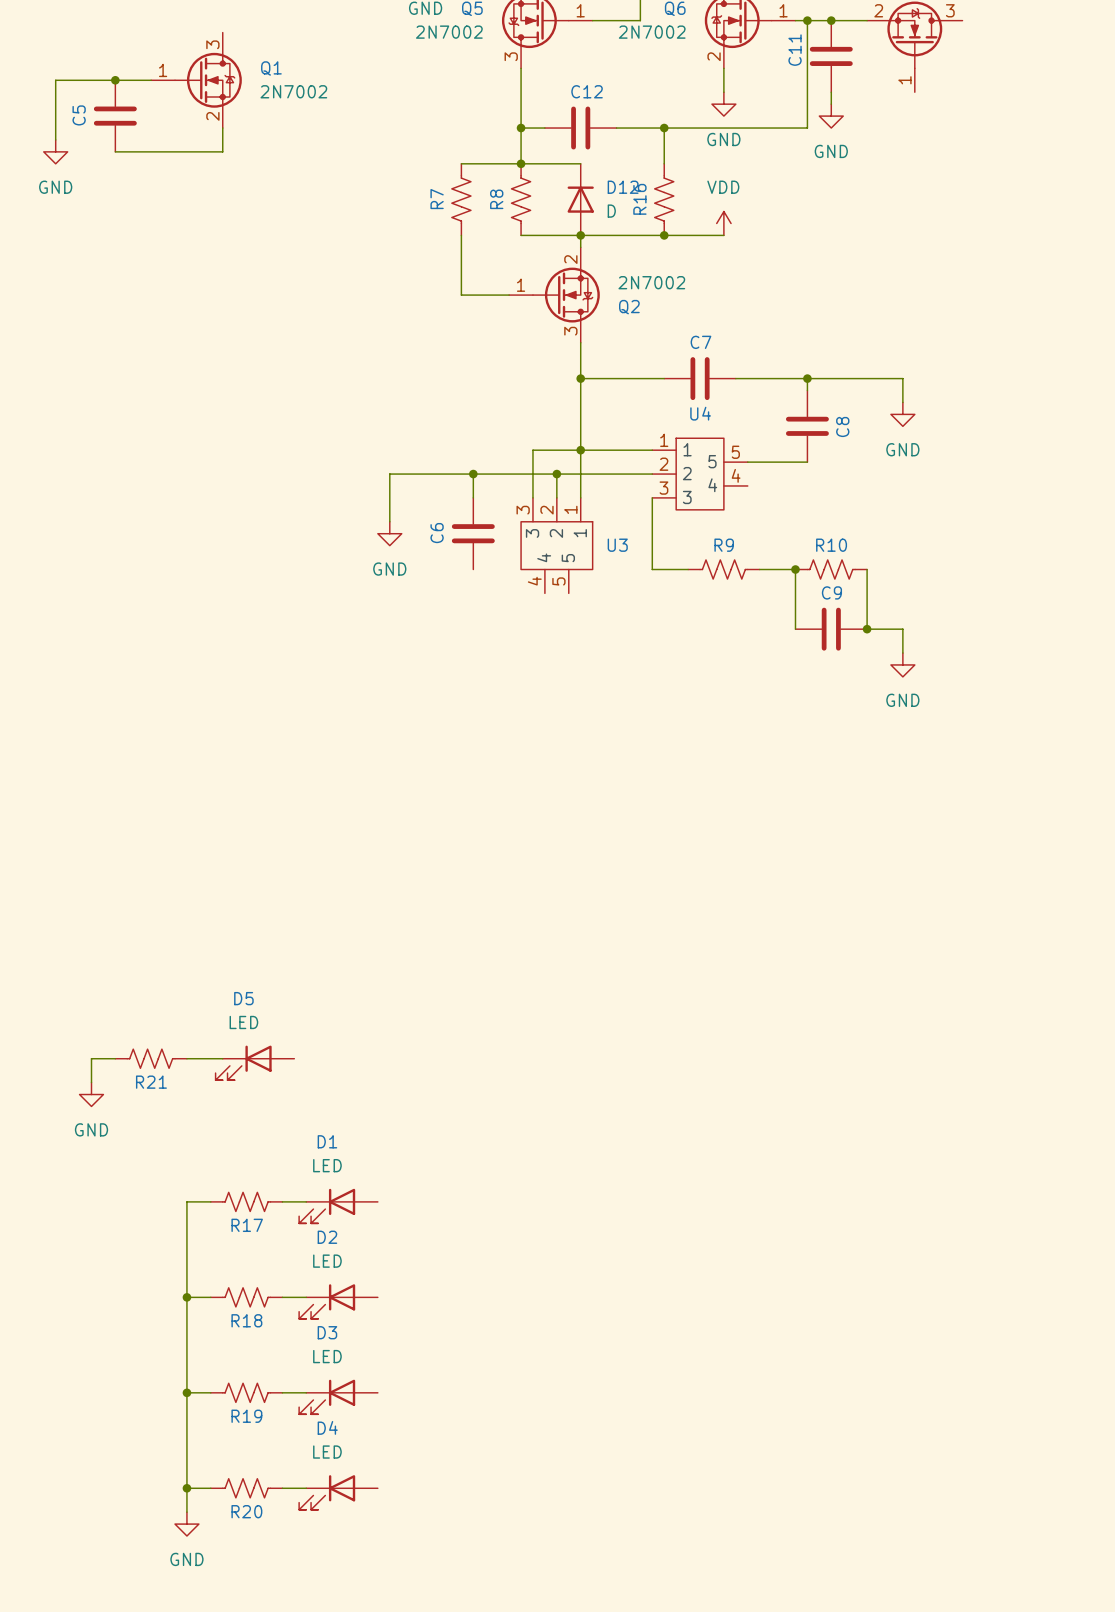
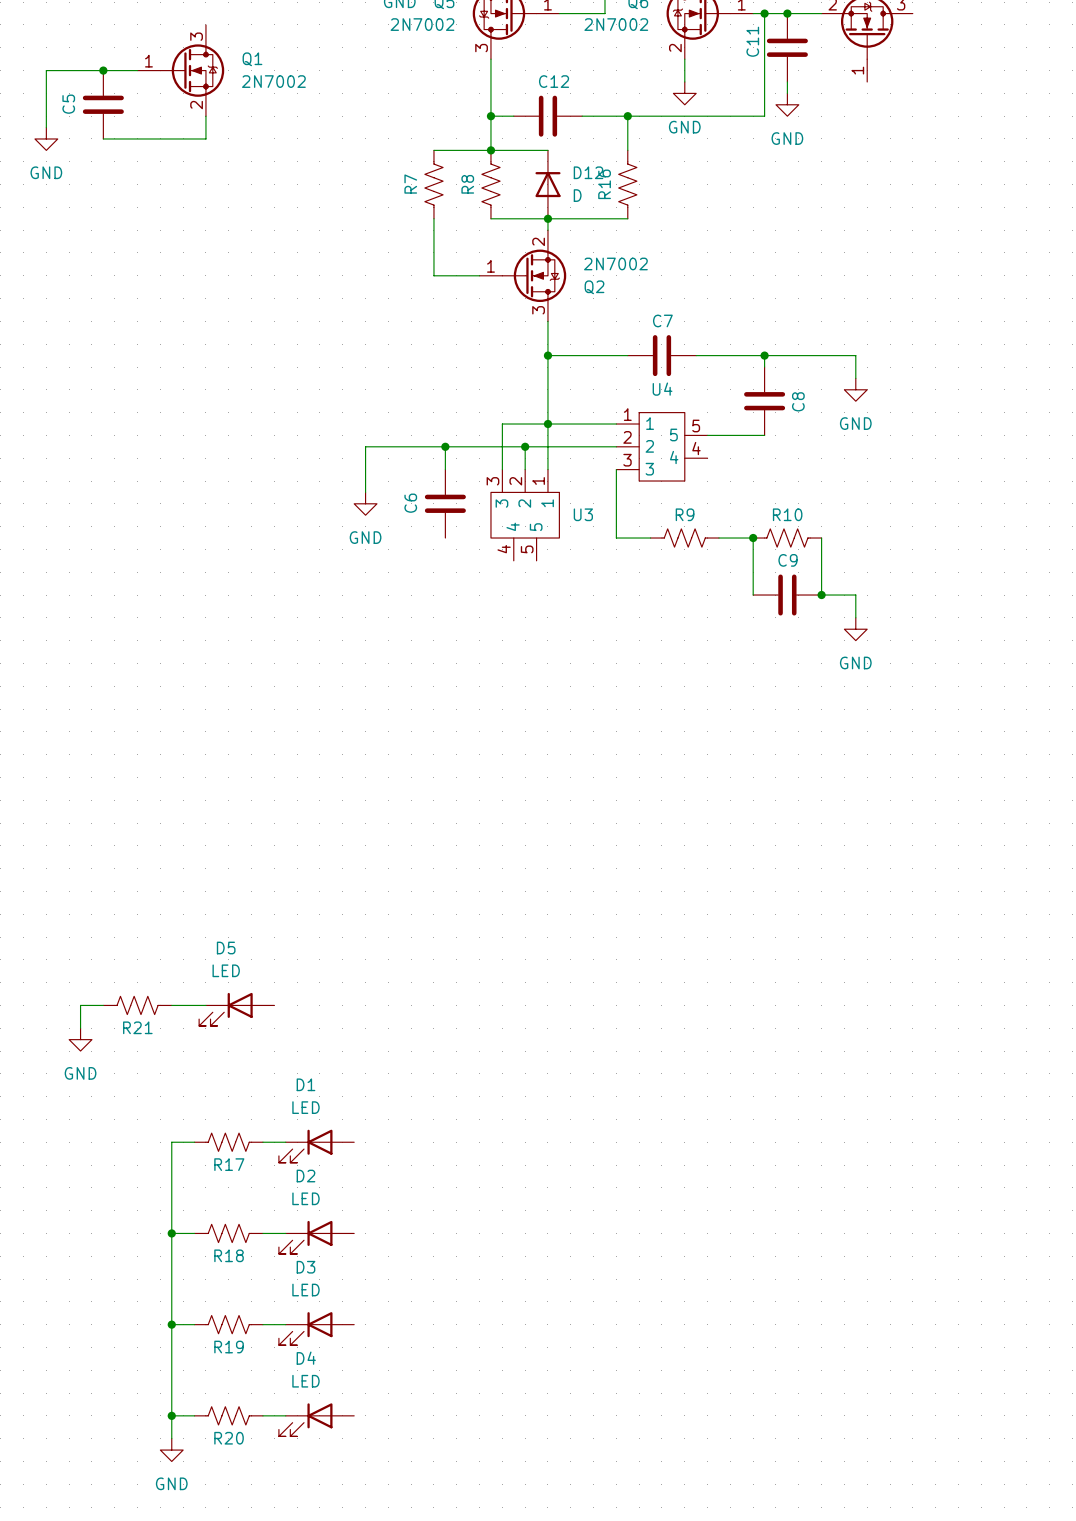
power symbol: VDD (723, 223) -> none
wire: (664, 235) (723, 235) -> none
junction: (664, 235) -> none

